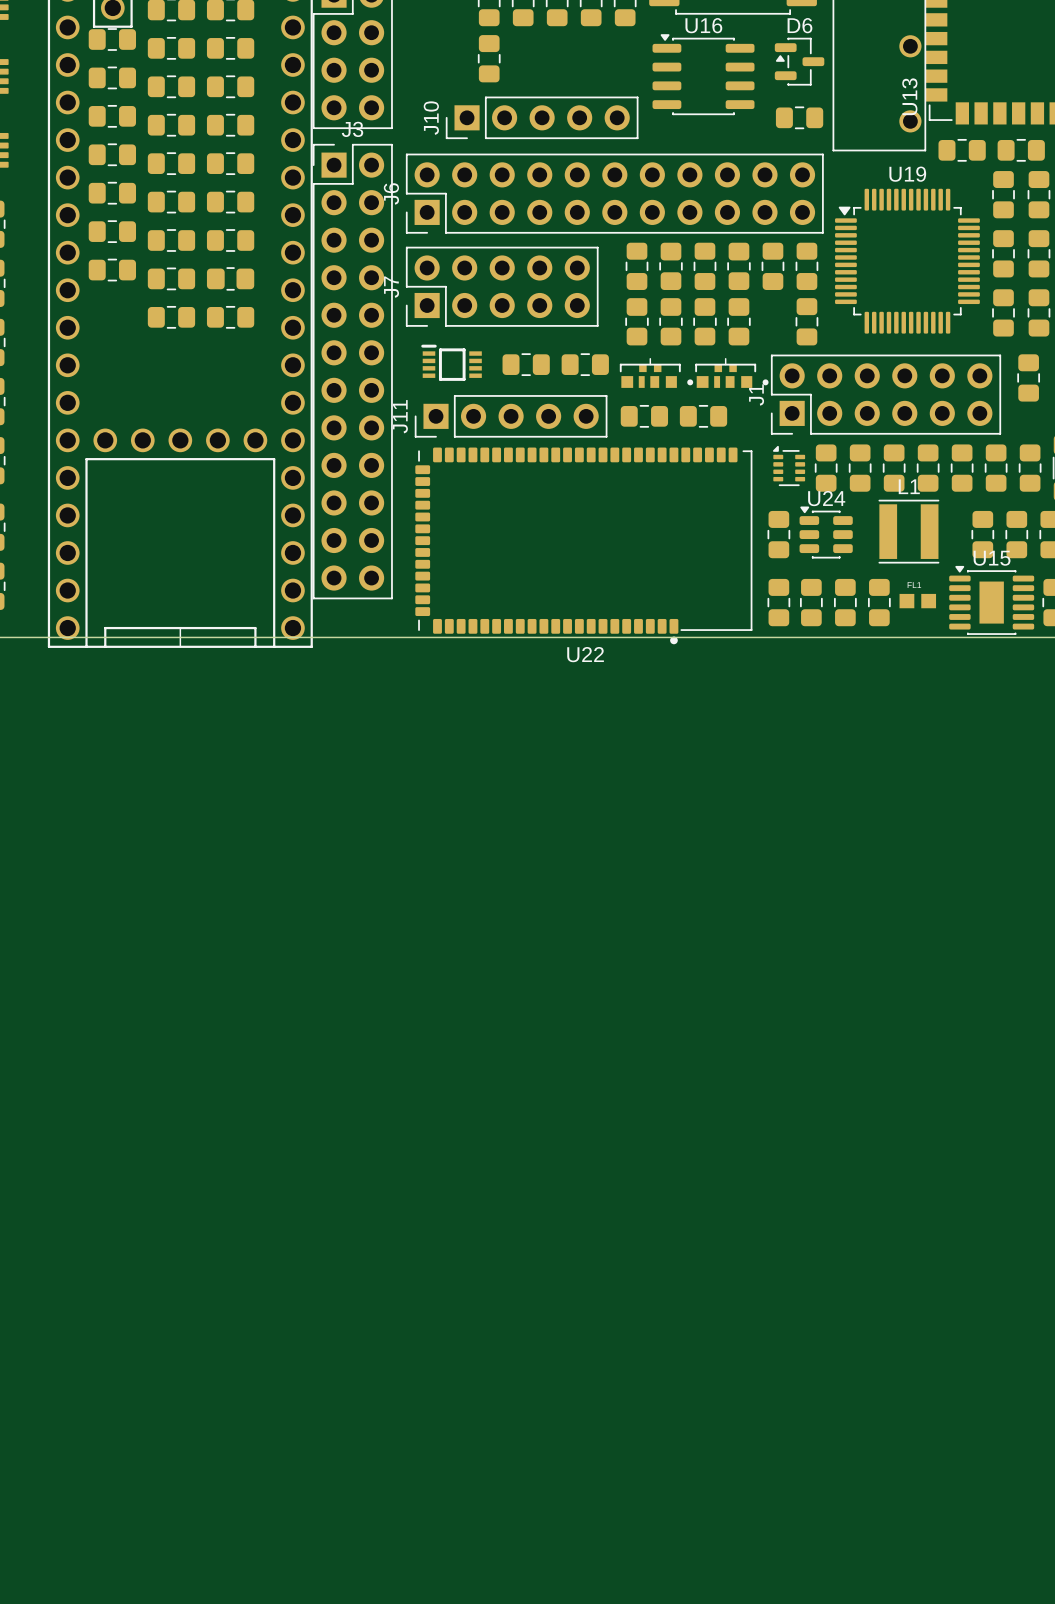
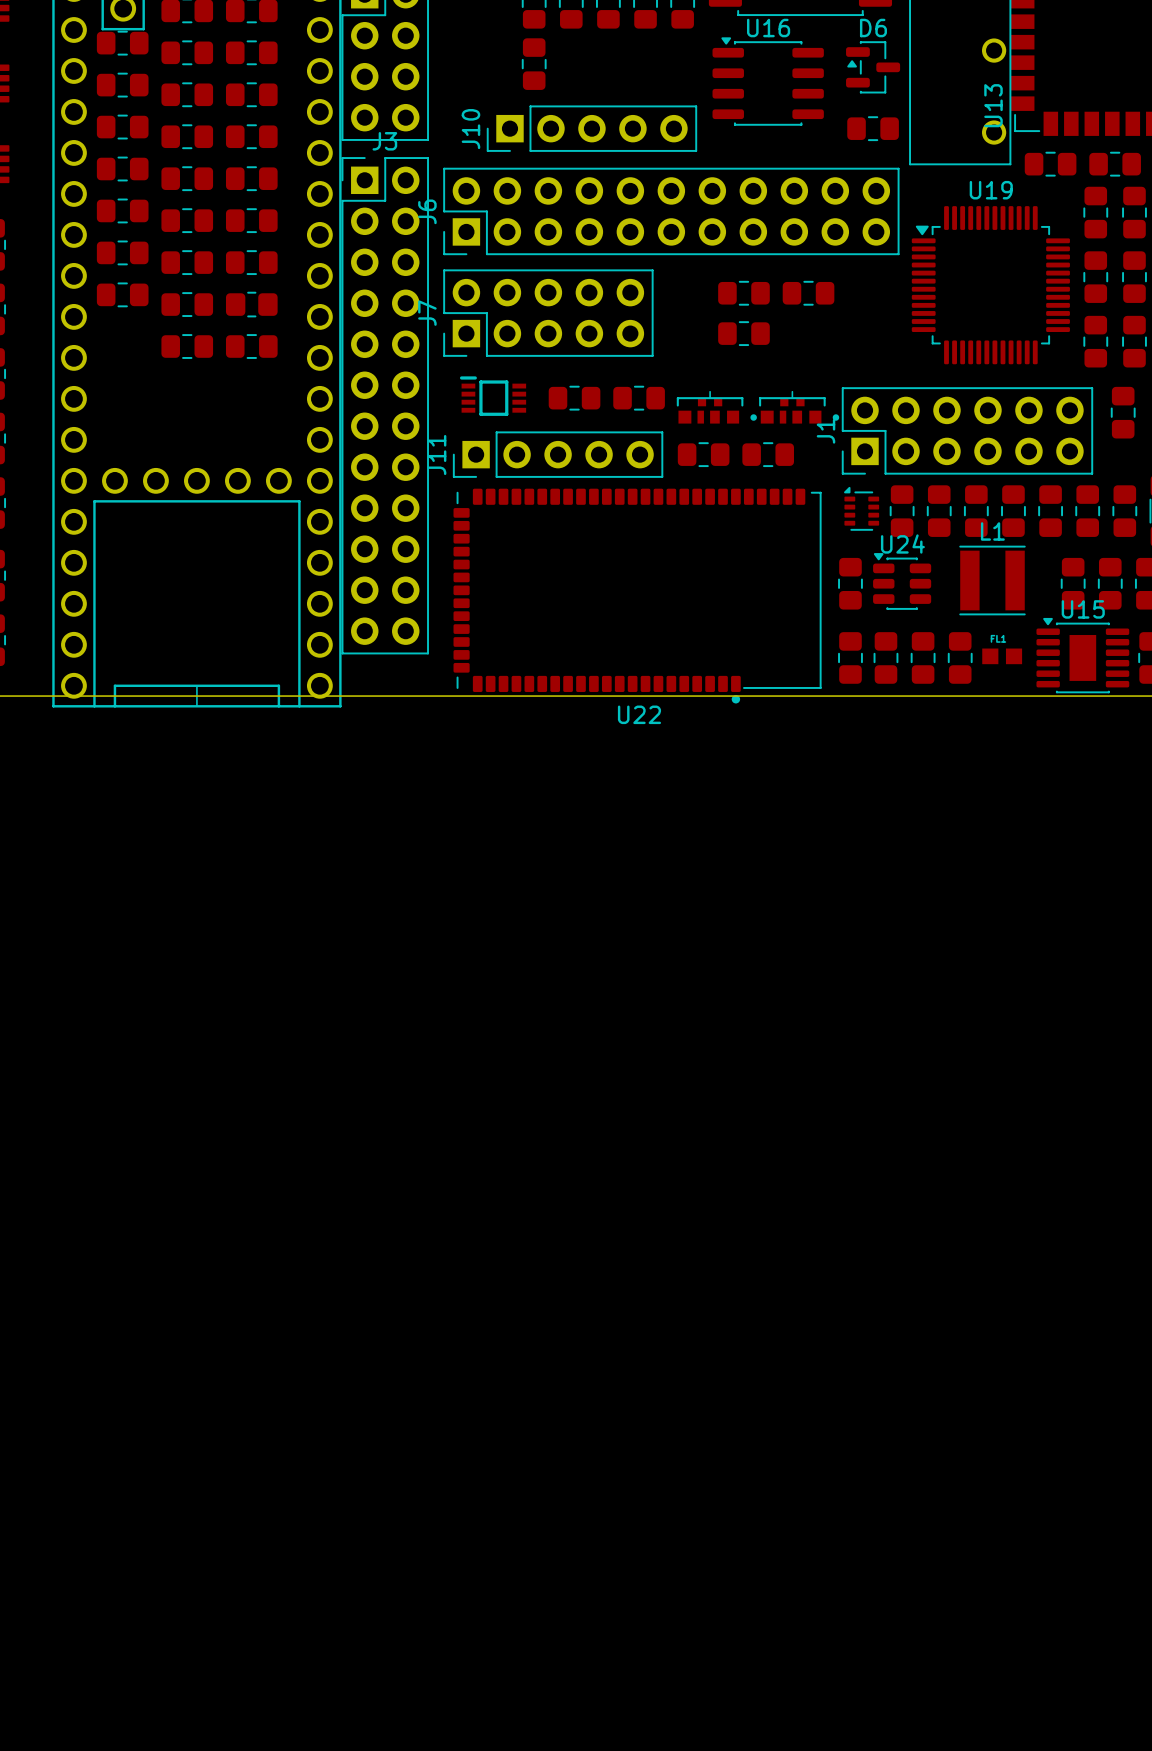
part footprint: [659, 242, 683, 291] -> [718, 280, 770, 306]
part footprint: [727, 242, 751, 291] -> [782, 280, 835, 306]
part: (637, 266) -> none
part: (704, 266) -> none
part: (772, 266) -> none
part: (806, 266) -> none
part: none -> (743, 333)
part: (637, 321) -> none
part: (670, 321) -> none
part: (704, 321) -> none
part: (738, 321) -> none
part: (806, 321) -> none

